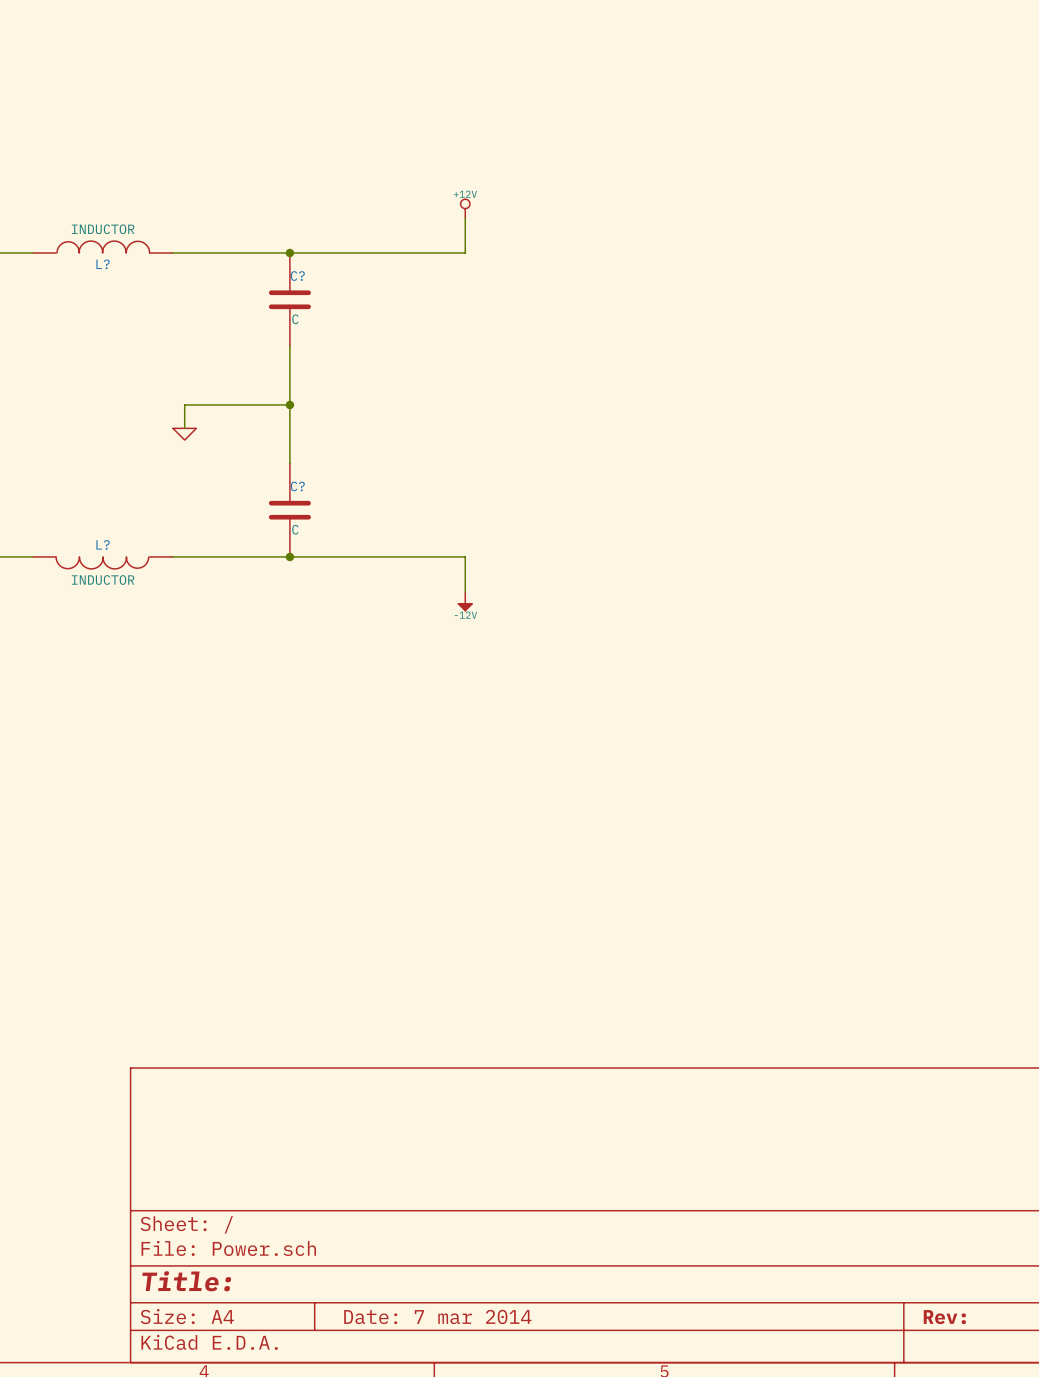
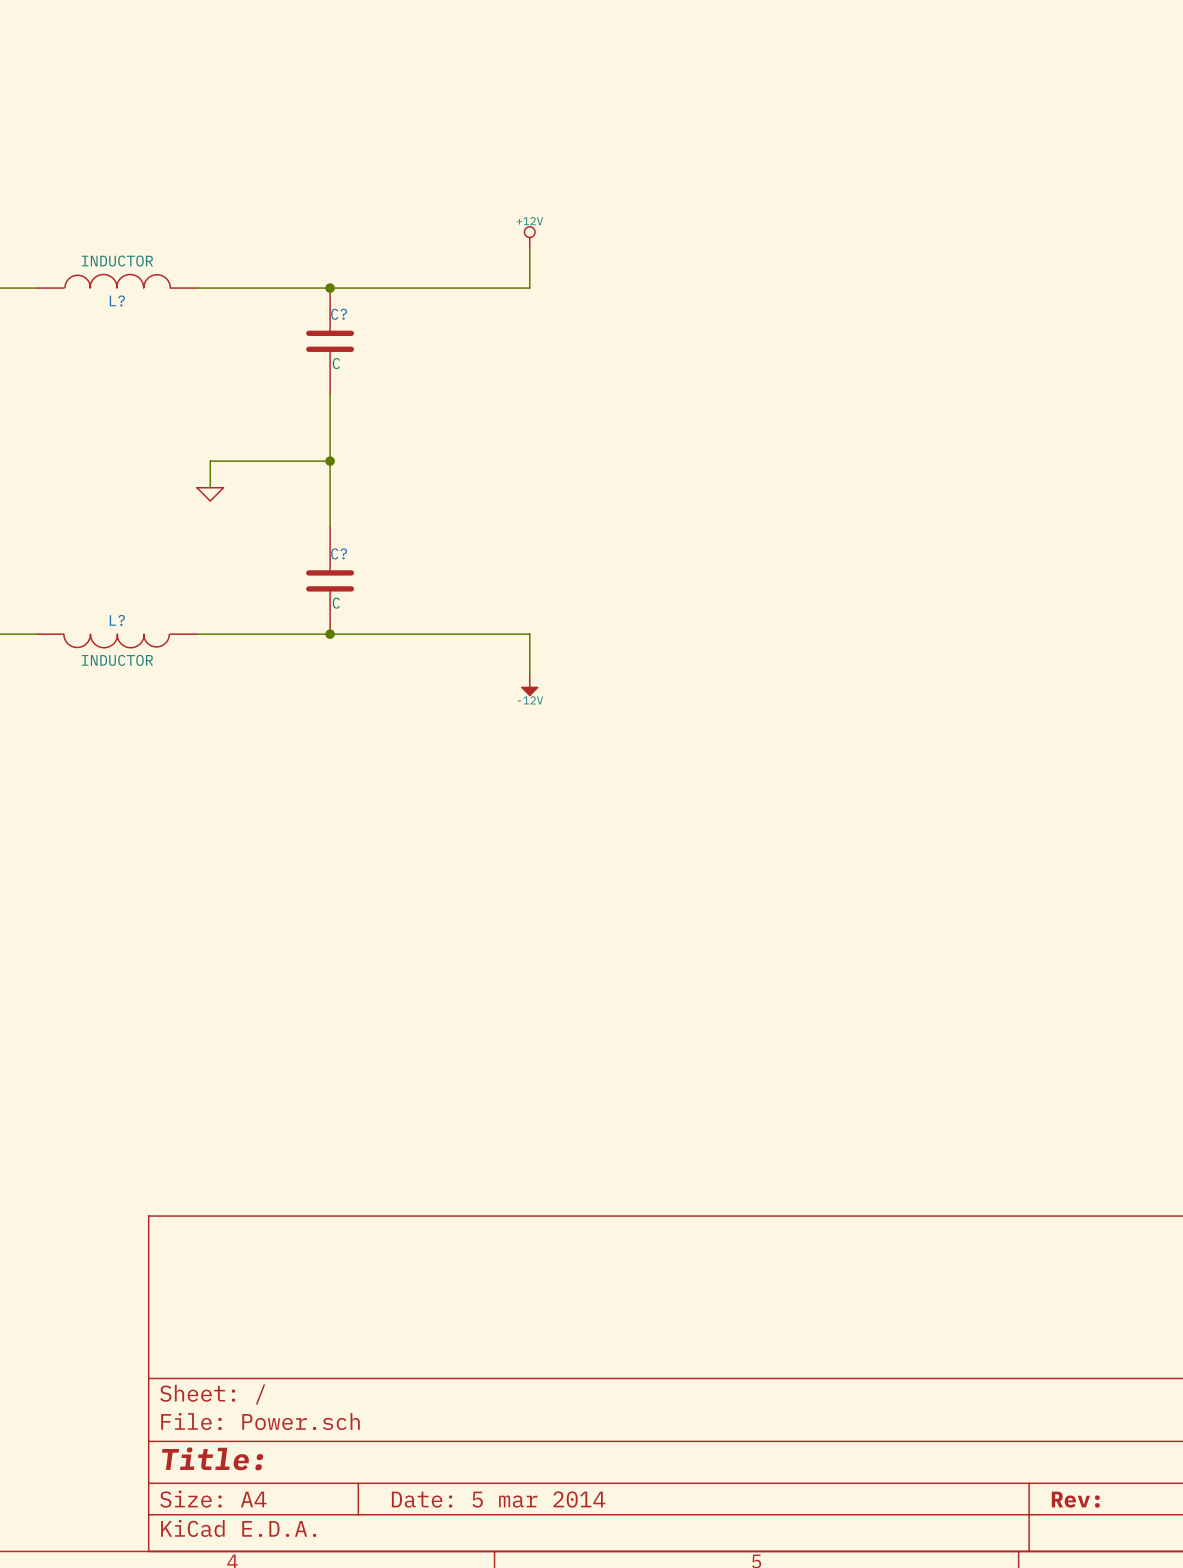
title block: Date: 7 mar 2014 (437, 1316) -> Date: 5 mar 2014 (498, 1499)

